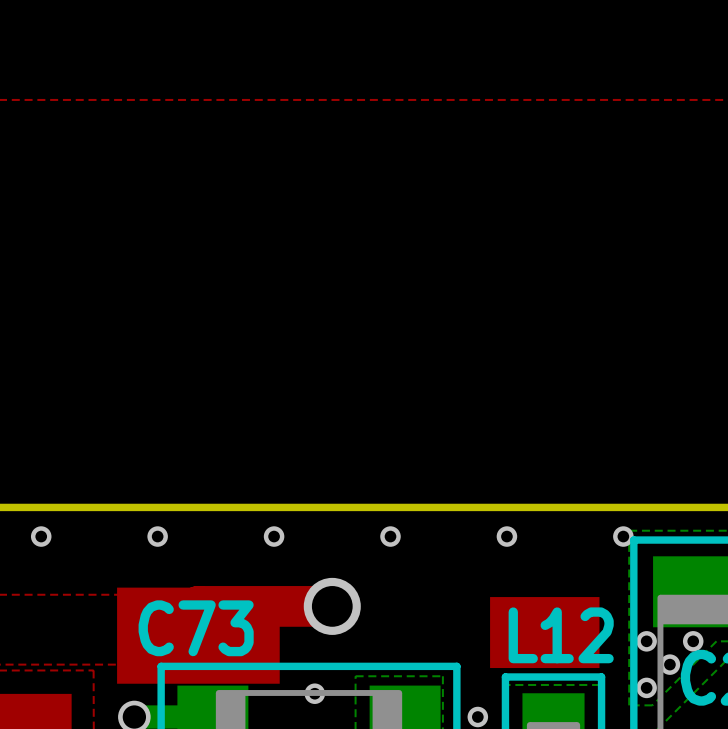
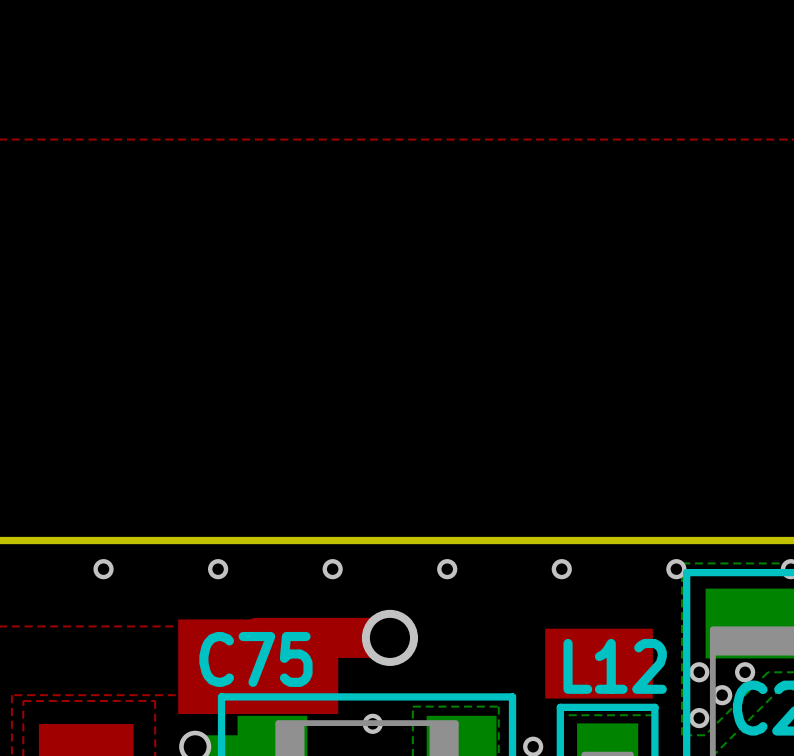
C73 name: C73 (196, 628) -> C75 (255, 659)

